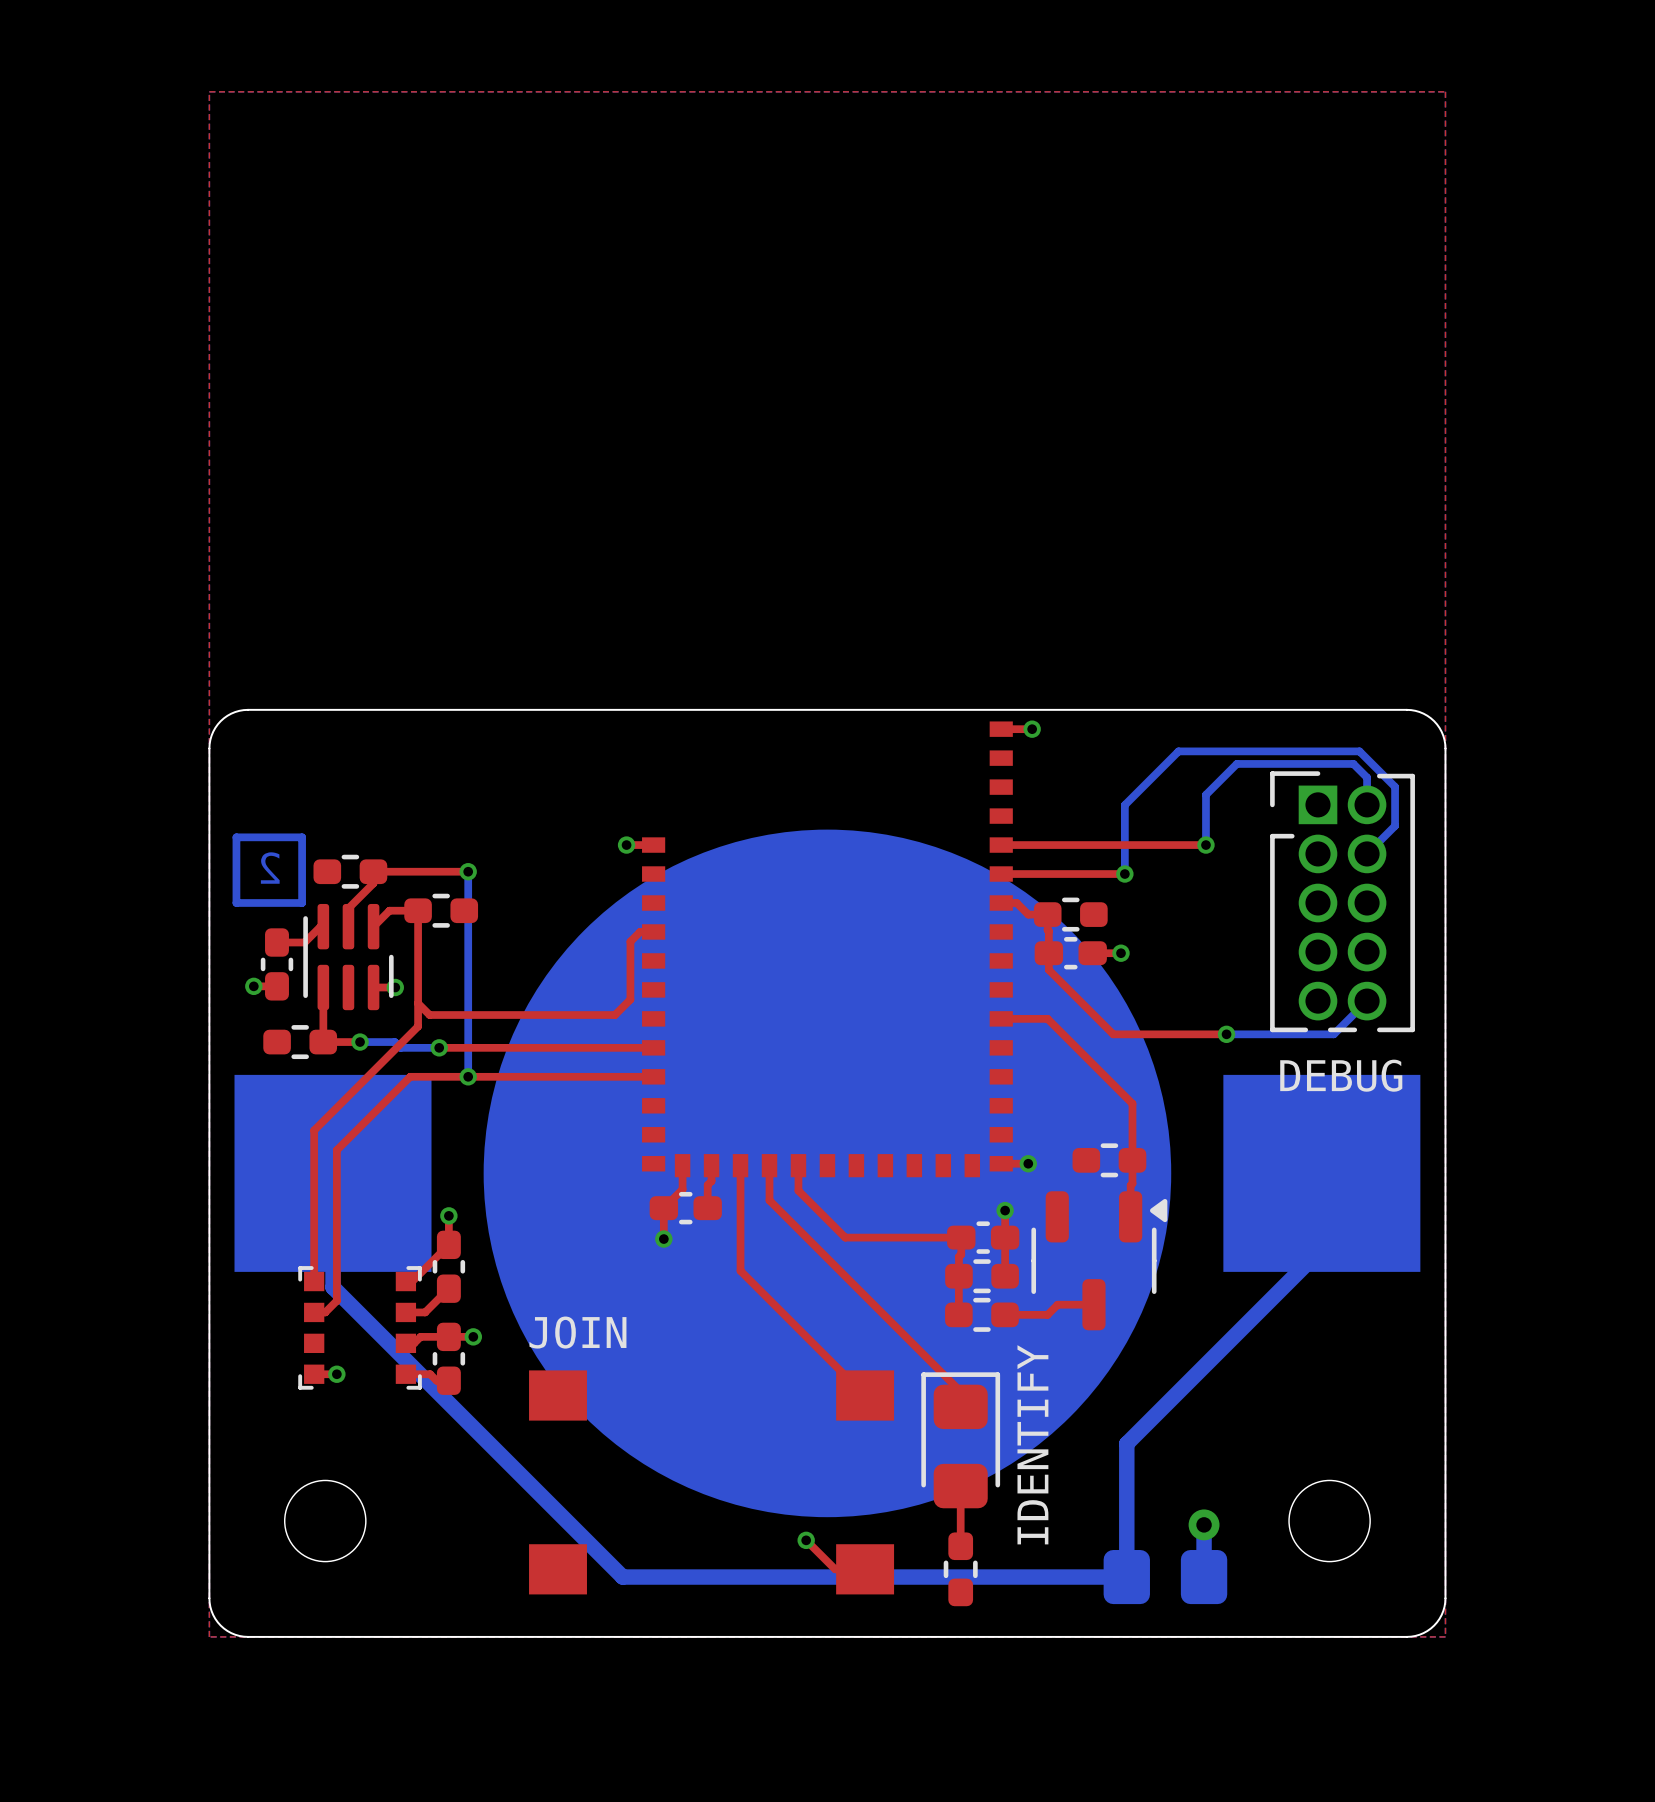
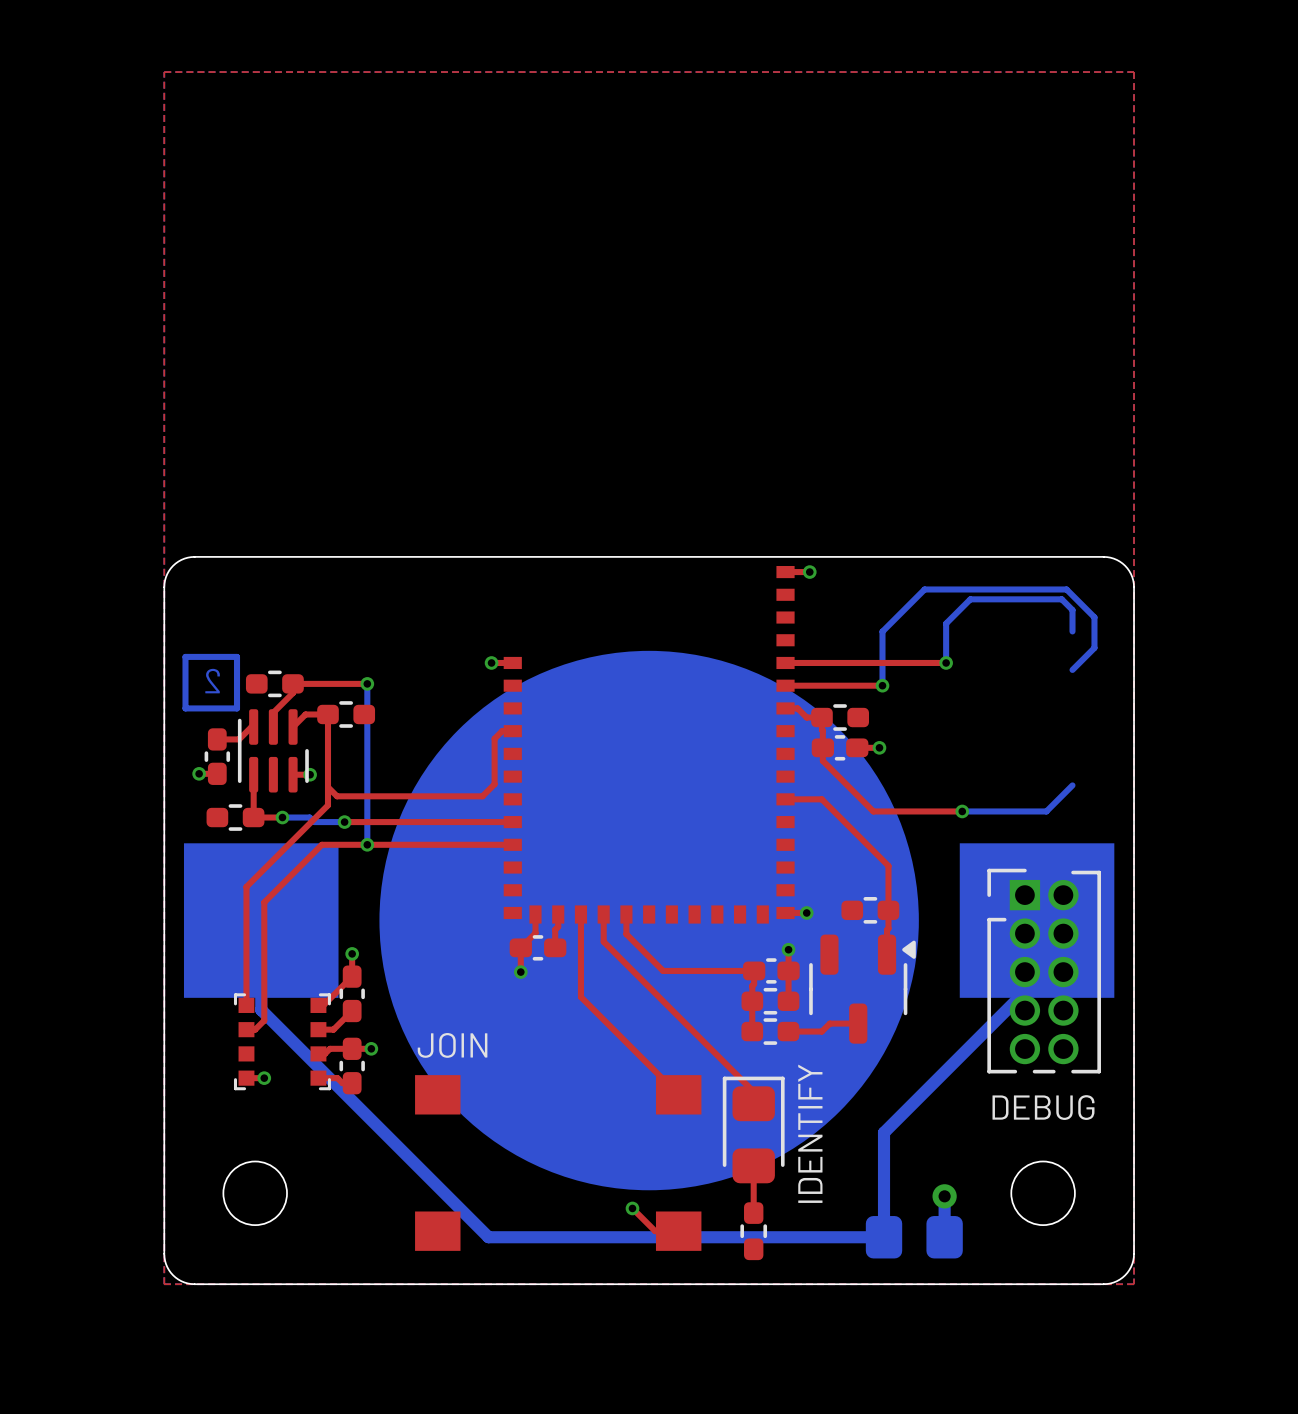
part position: (1342, 901) -> (1044, 971)

